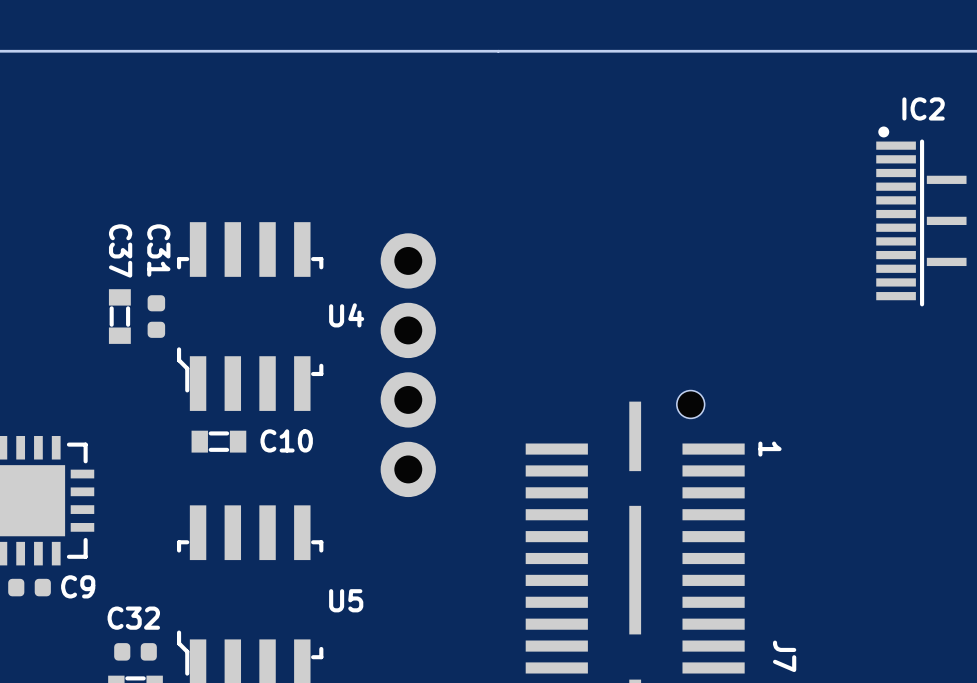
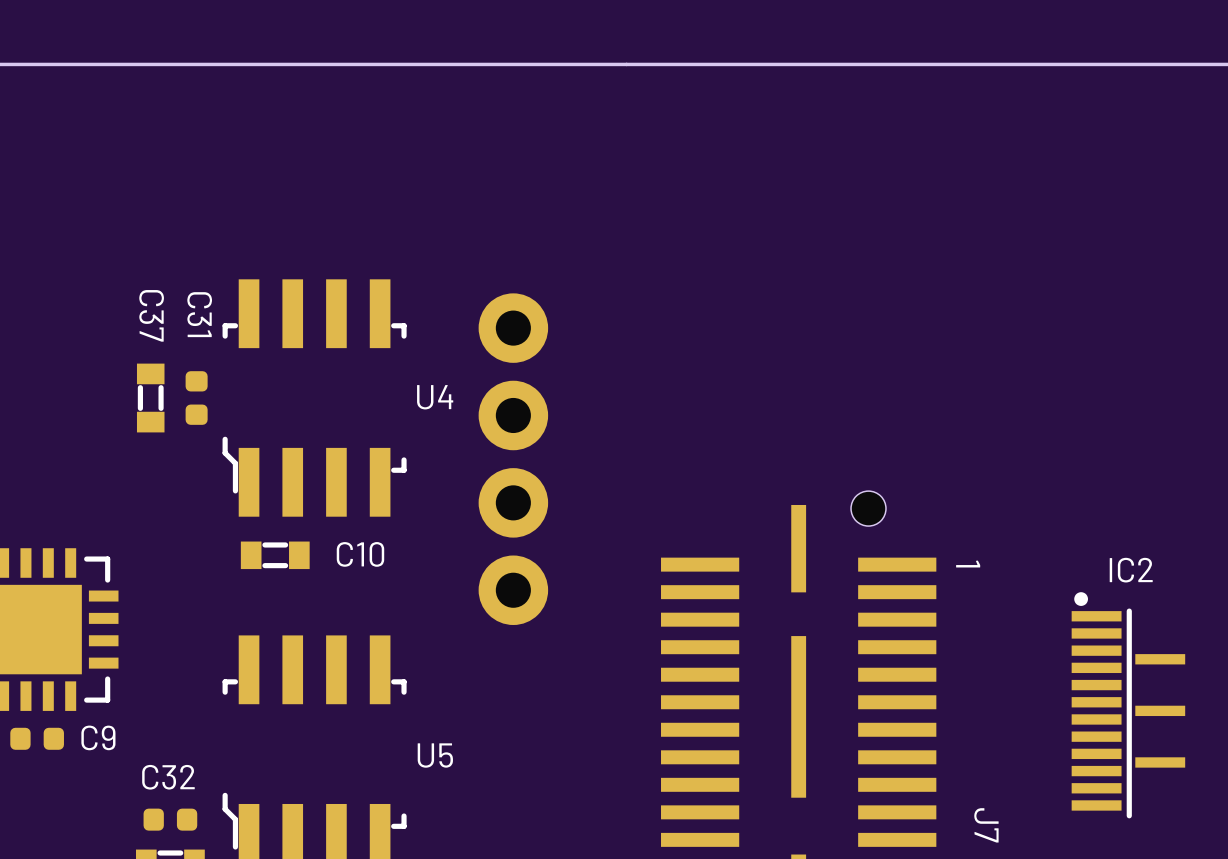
IC2 position: (921, 216) -> (1128, 705)

